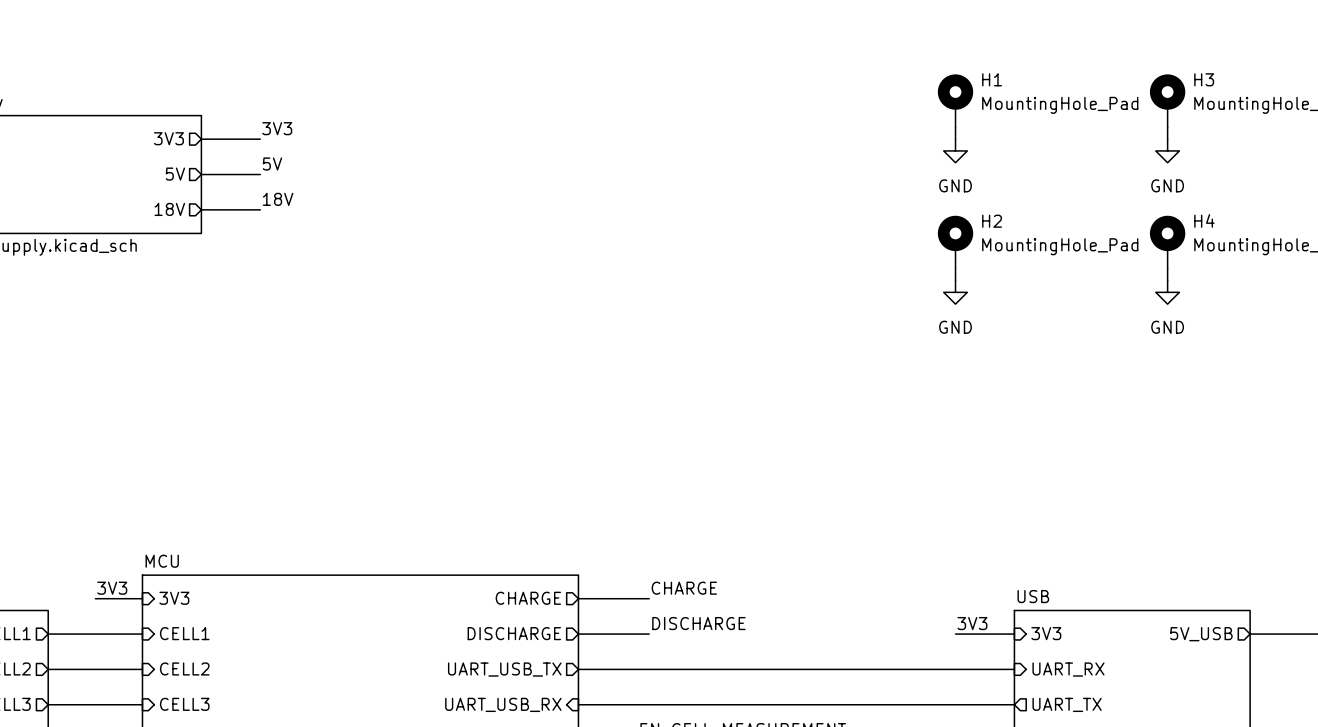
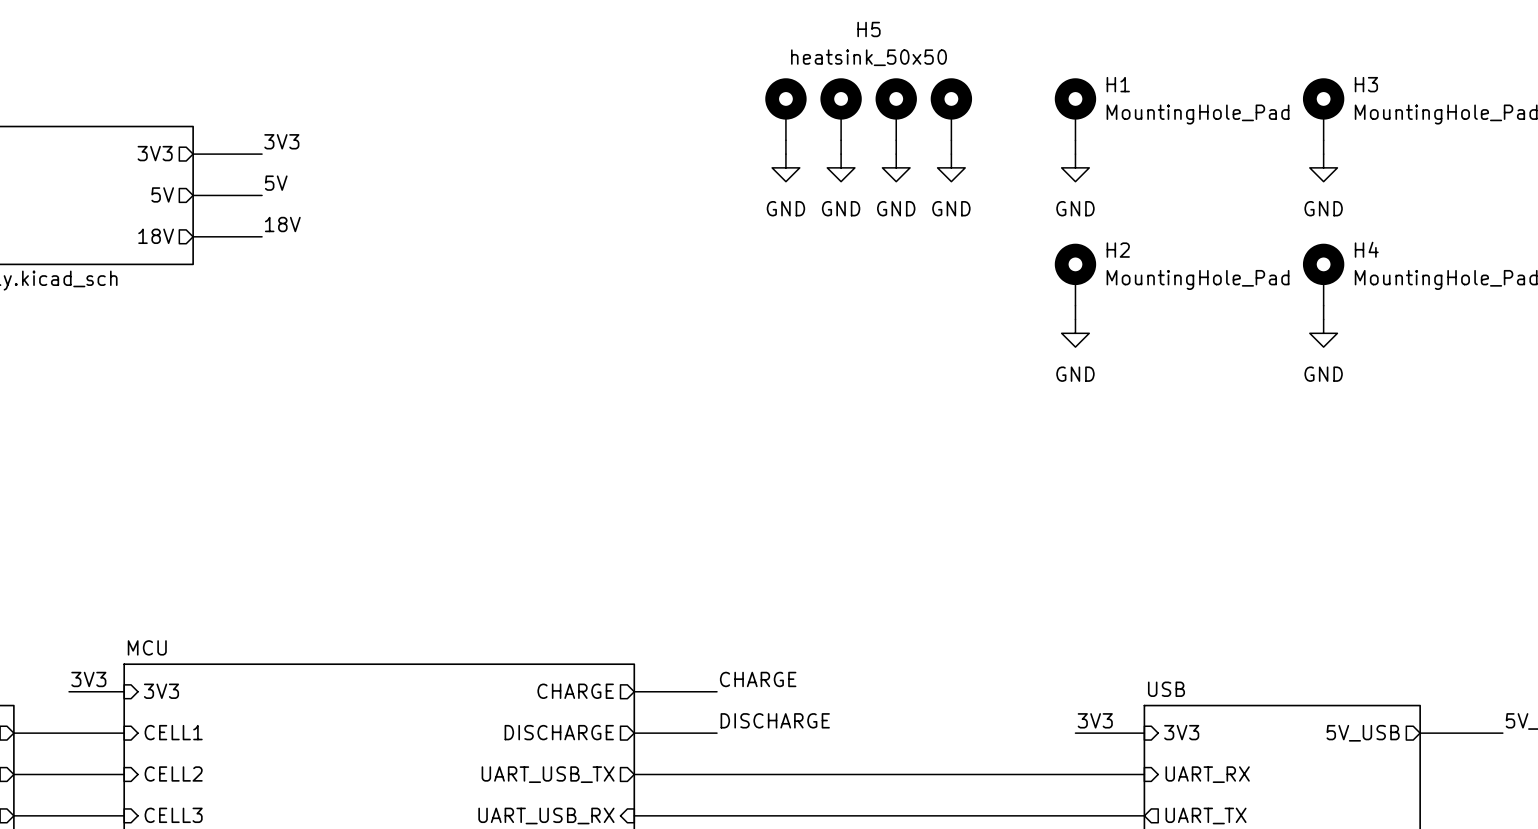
H5: none -> heatsink_50x50 (868, 109)
wire: none -> (785, 140) (785, 154)
wire: none -> (841, 140) (841, 154)
wire: none -> (896, 140) (896, 154)
wire: none -> (951, 140) (951, 154)
power symbol: none -> GND (785, 167)
power symbol: none -> GND (841, 167)
power symbol: none -> GND (896, 167)
power symbol: none -> GND (951, 167)

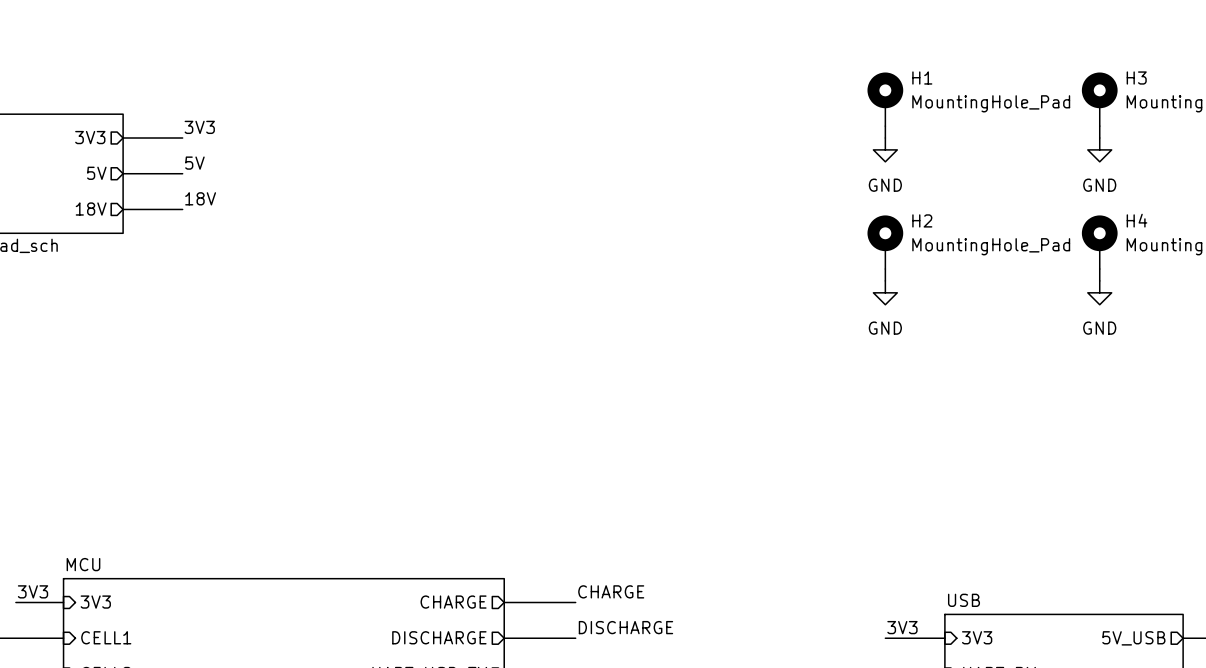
H5: heatsink_50x50 (868, 109) -> none
wire: (785, 140) (785, 154) -> none
wire: (841, 140) (841, 154) -> none
wire: (896, 140) (896, 154) -> none
wire: (951, 140) (951, 154) -> none
power symbol: GND (785, 167) -> none
power symbol: GND (841, 167) -> none
power symbol: GND (896, 167) -> none
power symbol: GND (951, 167) -> none

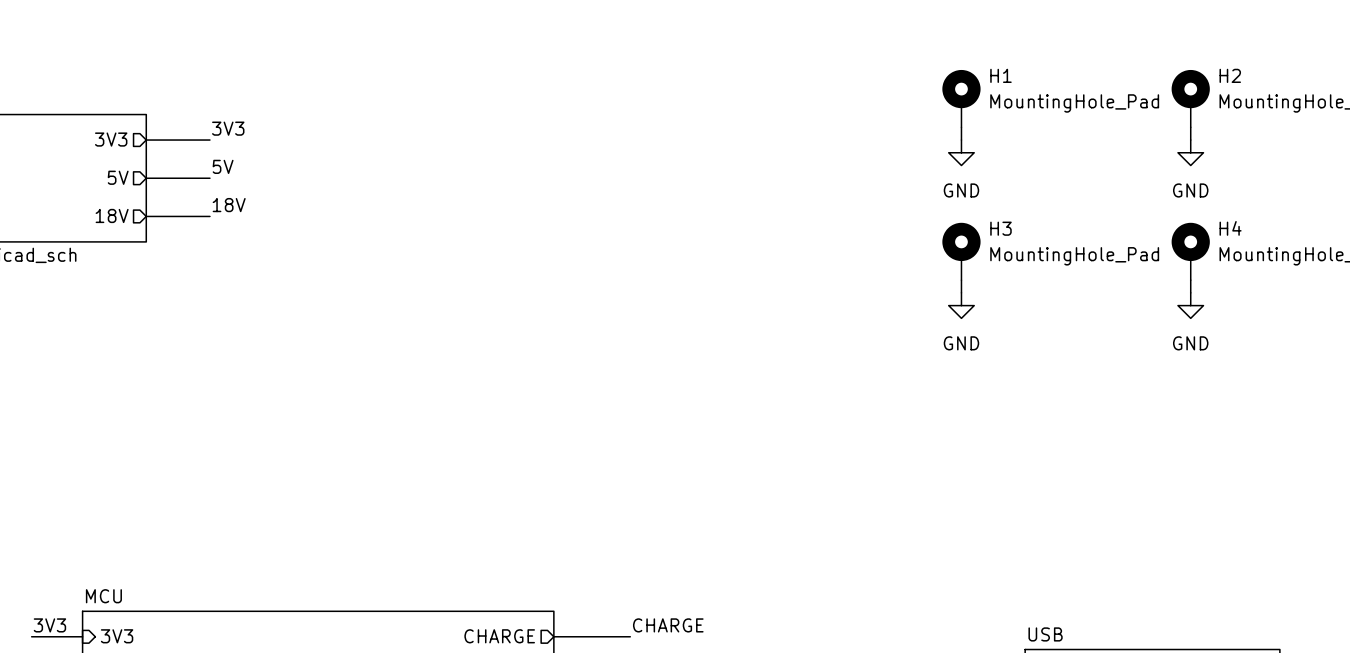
H3 name: H3 (1136, 78) -> H2 (1230, 75)
H2 name: H2 (922, 220) -> H3 (1000, 228)

